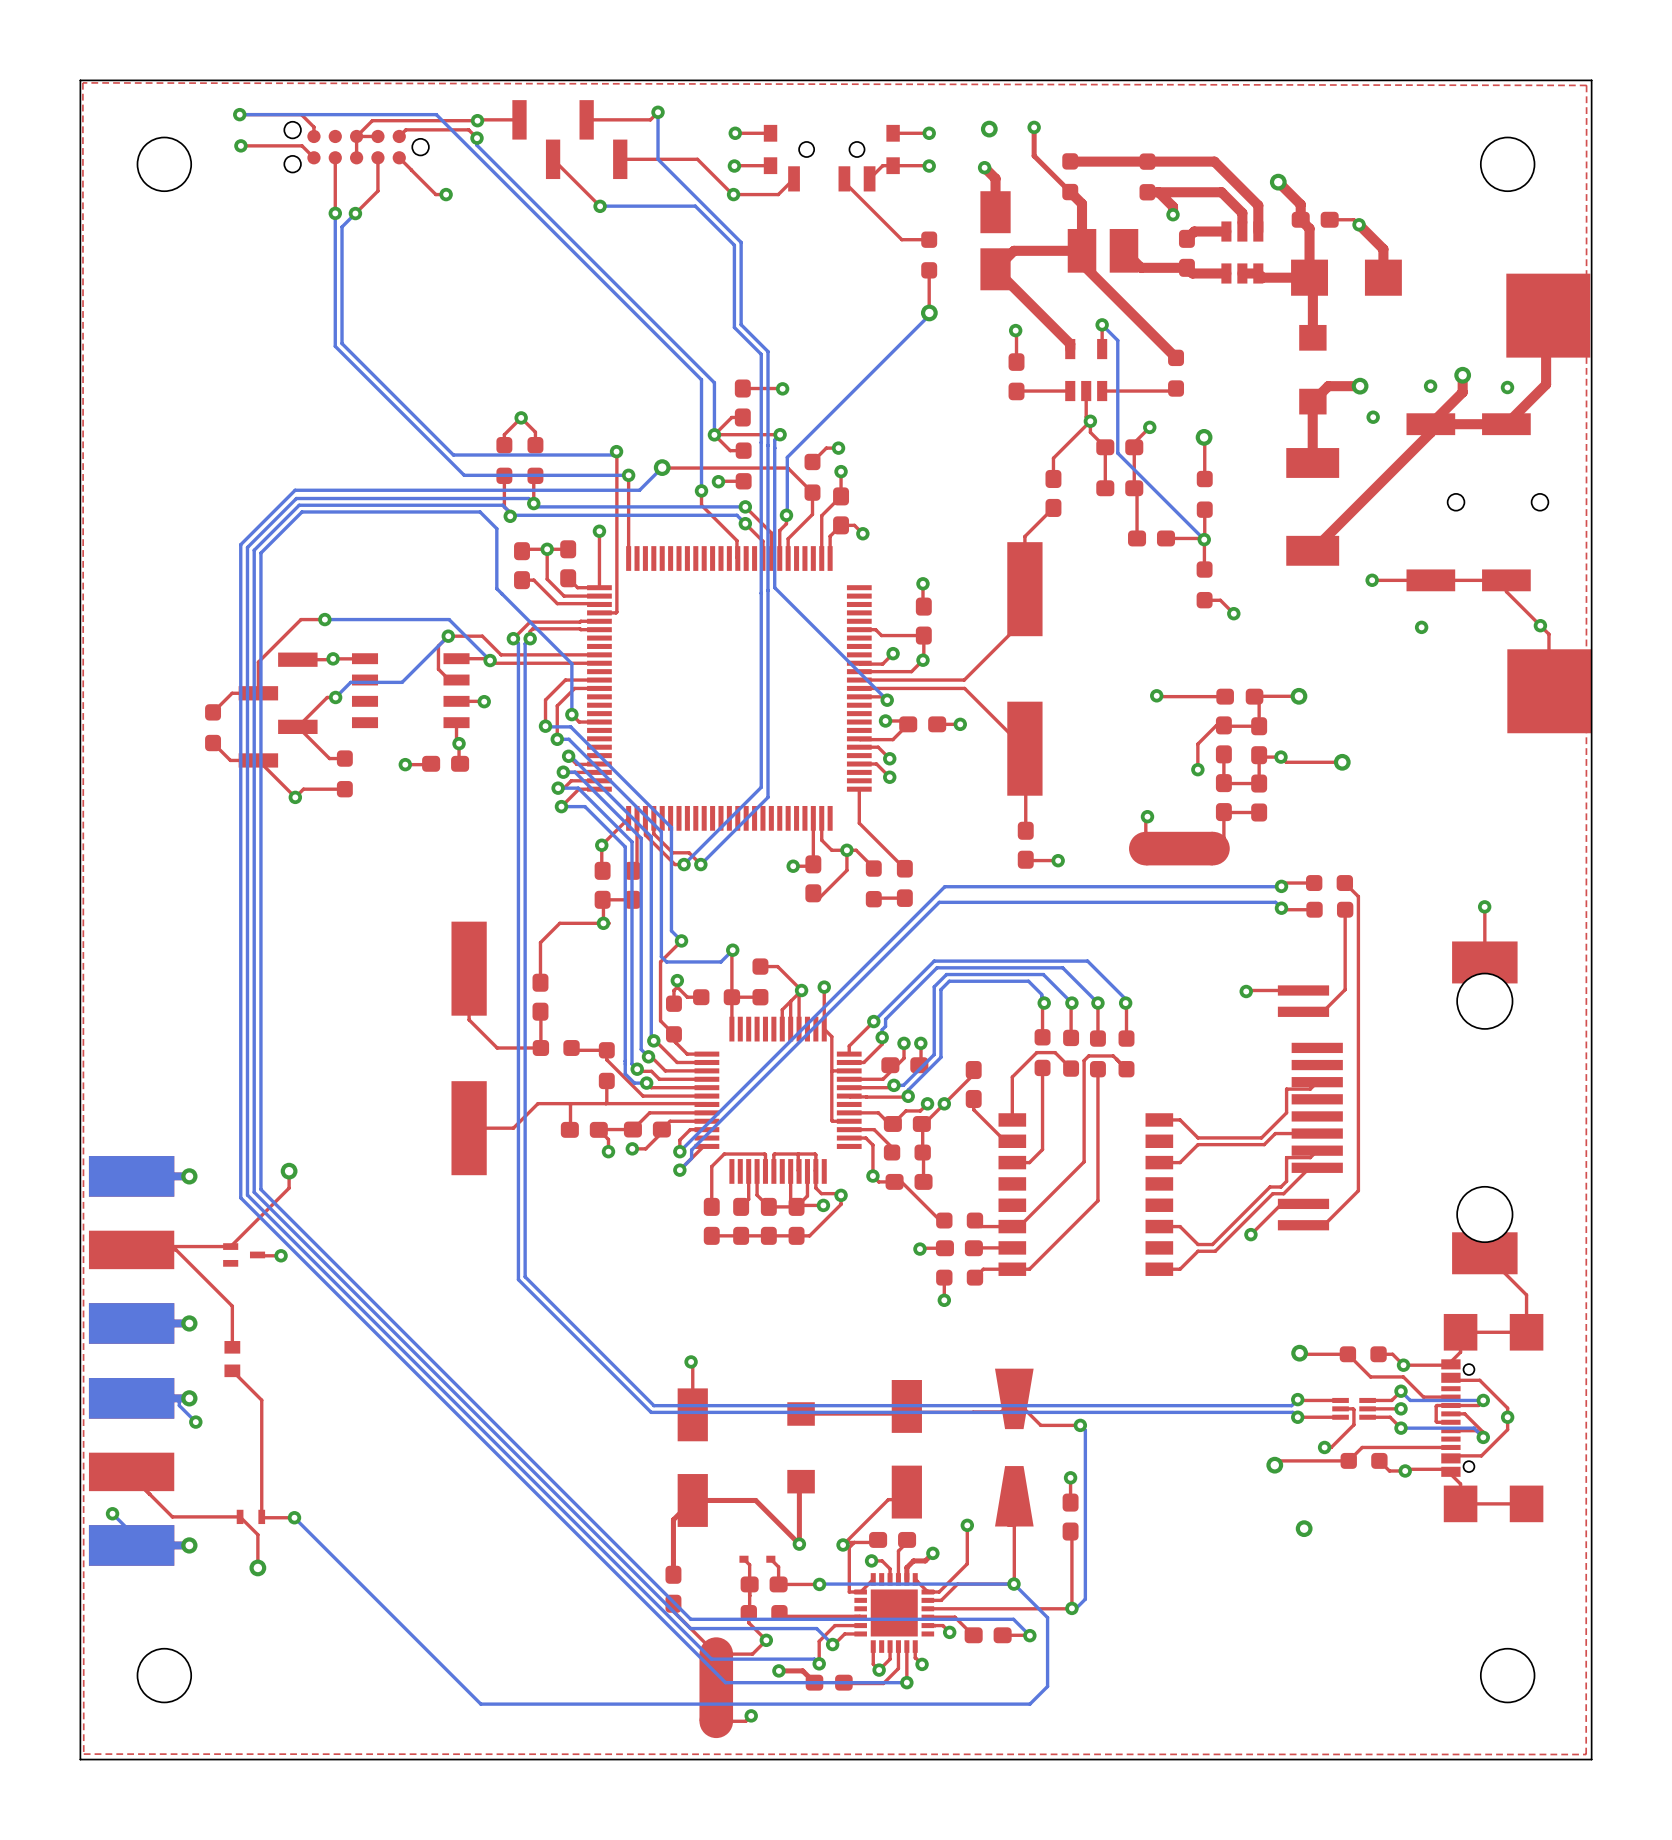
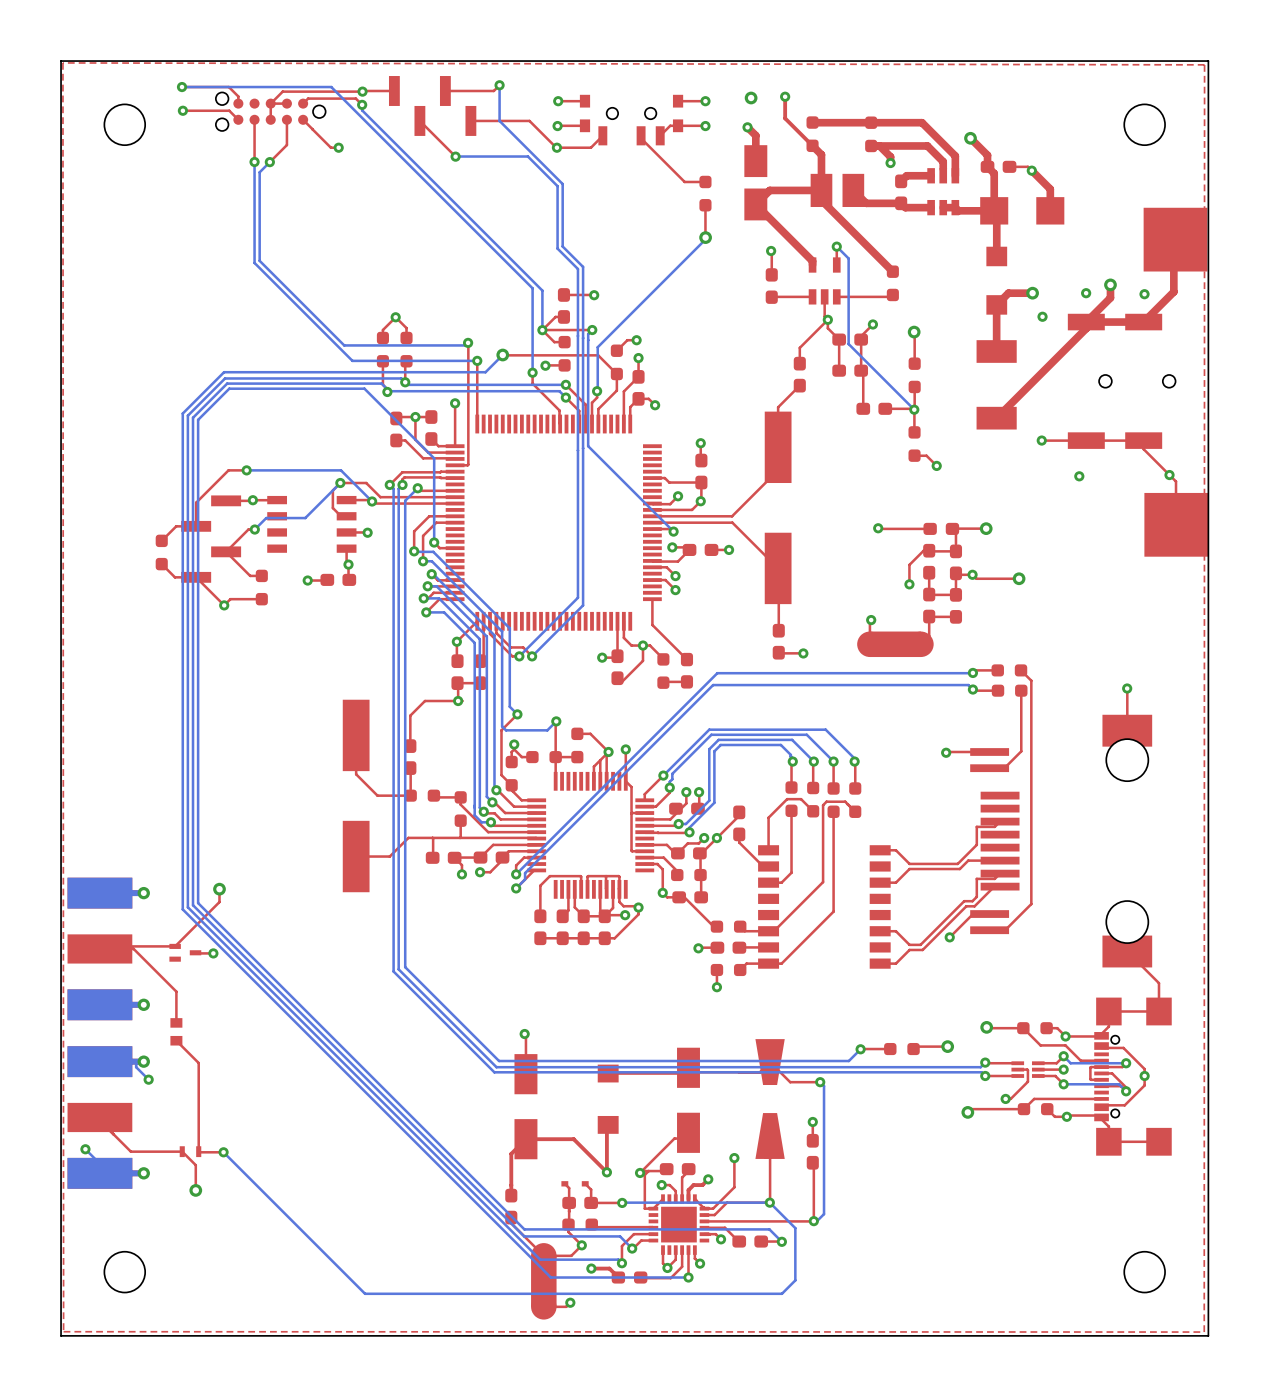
bottom track: (496, 528) (496, 588) (571, 663) -> (377, 401) (434, 458) (434, 503)
top track: none -> (417, 488) (420, 490) (455, 490)
bottom track: none -> (417, 488) (405, 500) (405, 967) (499, 1061) (848, 1061) (860, 1049)
via: none -> (417, 488)
top track: none -> (947, 1046) (915, 1046) (913, 1049)
top track: none -> (890, 1049) (860, 1049)
part: none -> (901, 1049)
via: none -> (860, 1049)
part position: (1304, 1528) -> (947, 1046)

